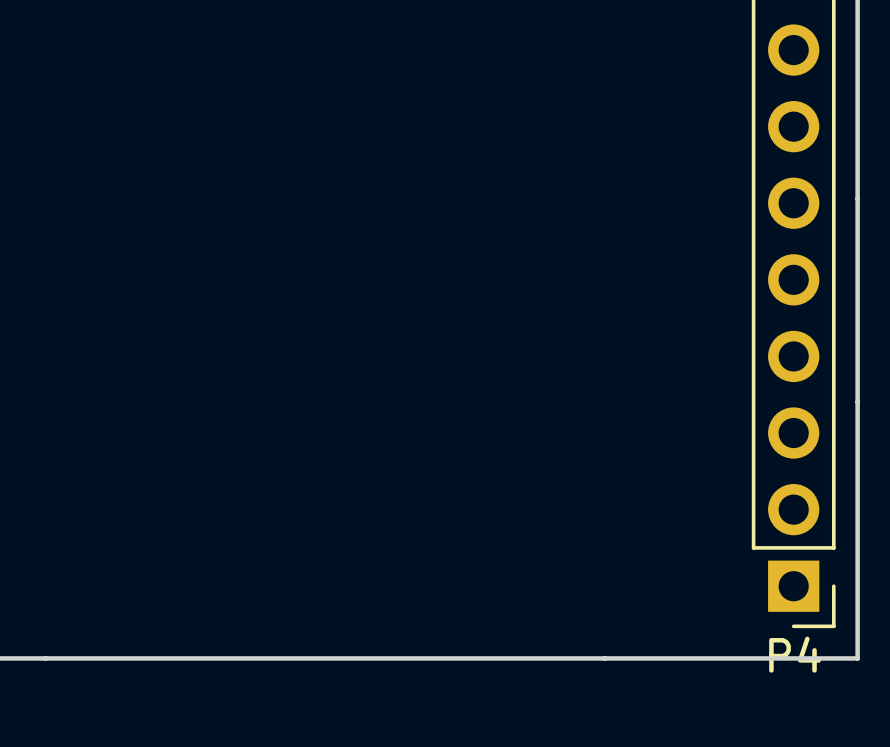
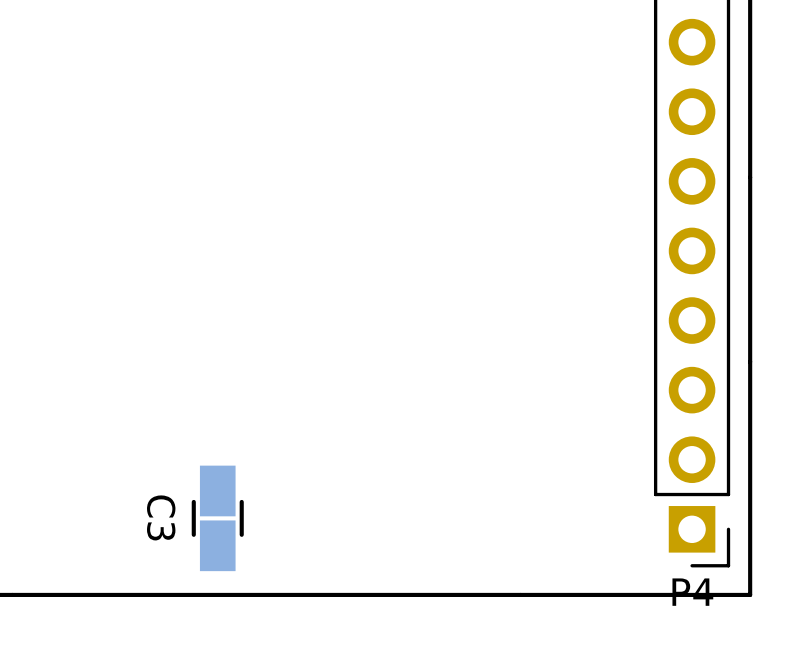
C3: none -> (217, 518)

